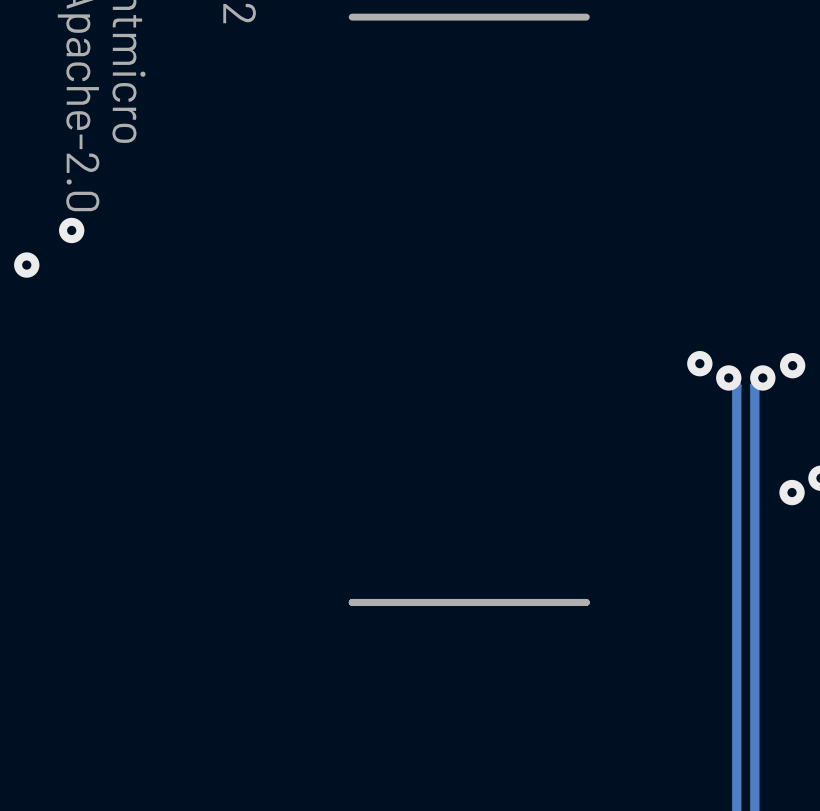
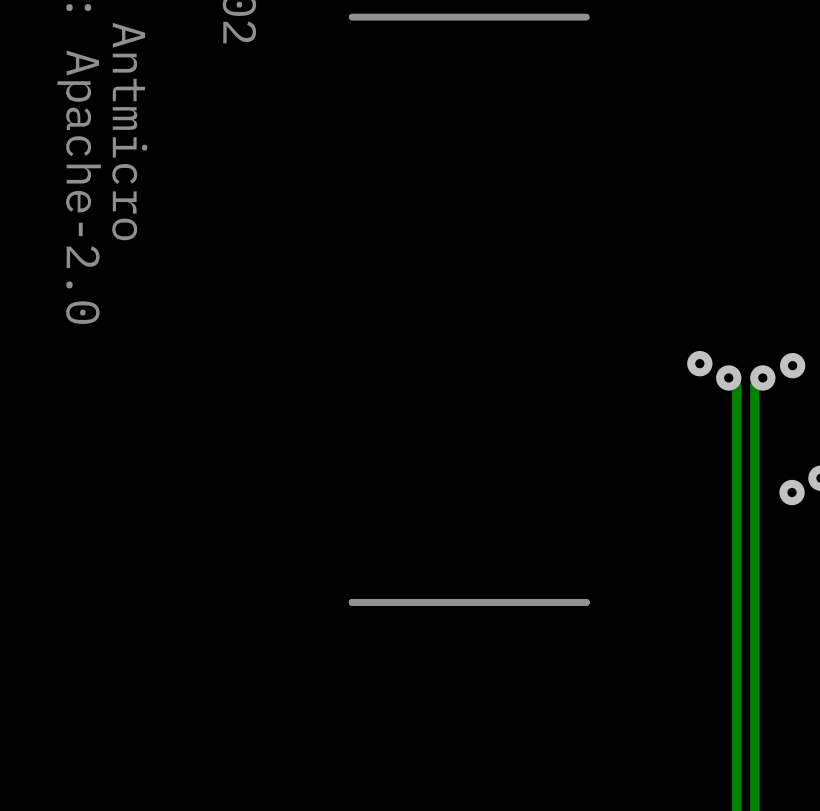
via: (71, 230) -> none
via: (26, 265) -> none

